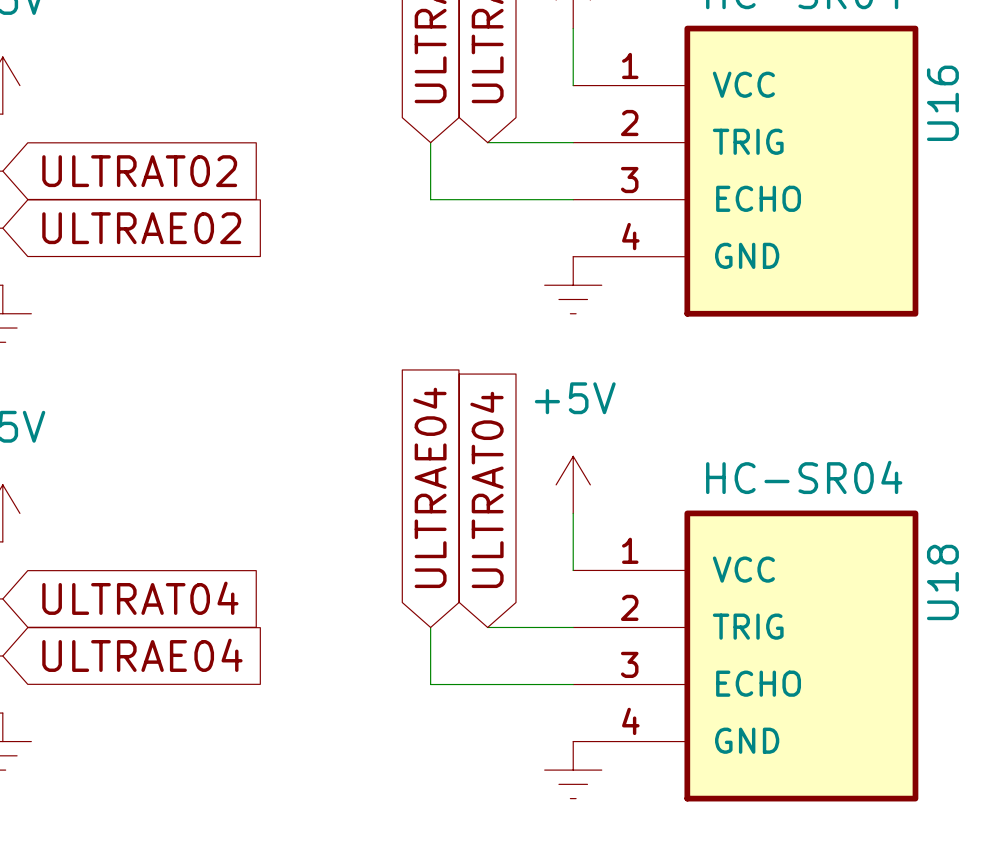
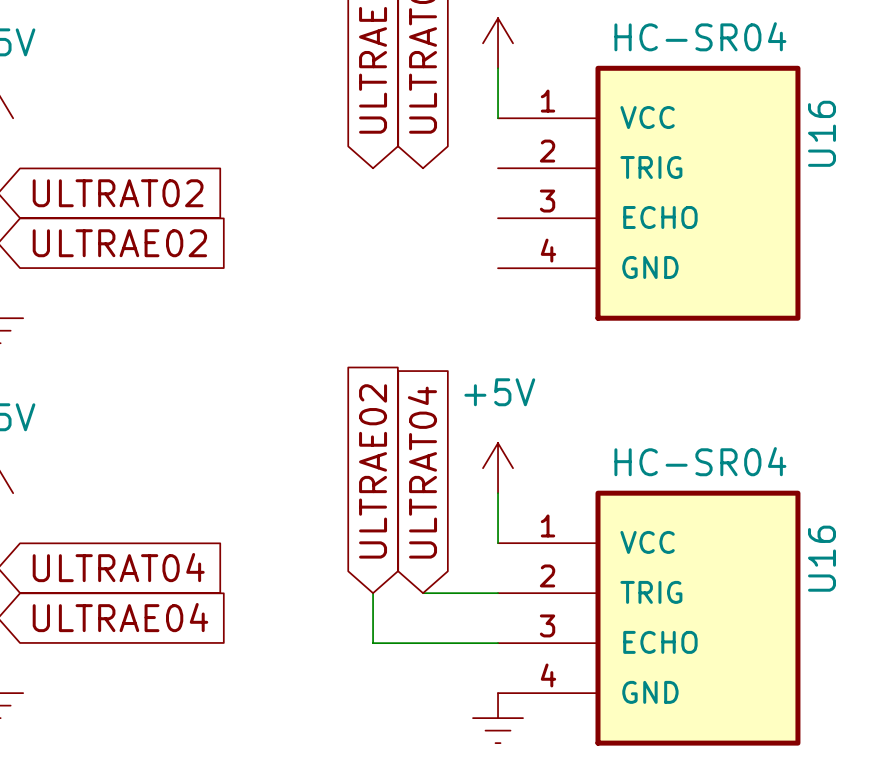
wire: (430, 142) (430, 199) (573, 199) -> none
wire: (487, 142) (573, 142) -> none
power symbol: (573, 285) -> none
global label: ULTRAE04 (429, 487) -> ULTRAE02 (373, 471)
U18 name: U18 (942, 582) -> U16 (822, 558)

